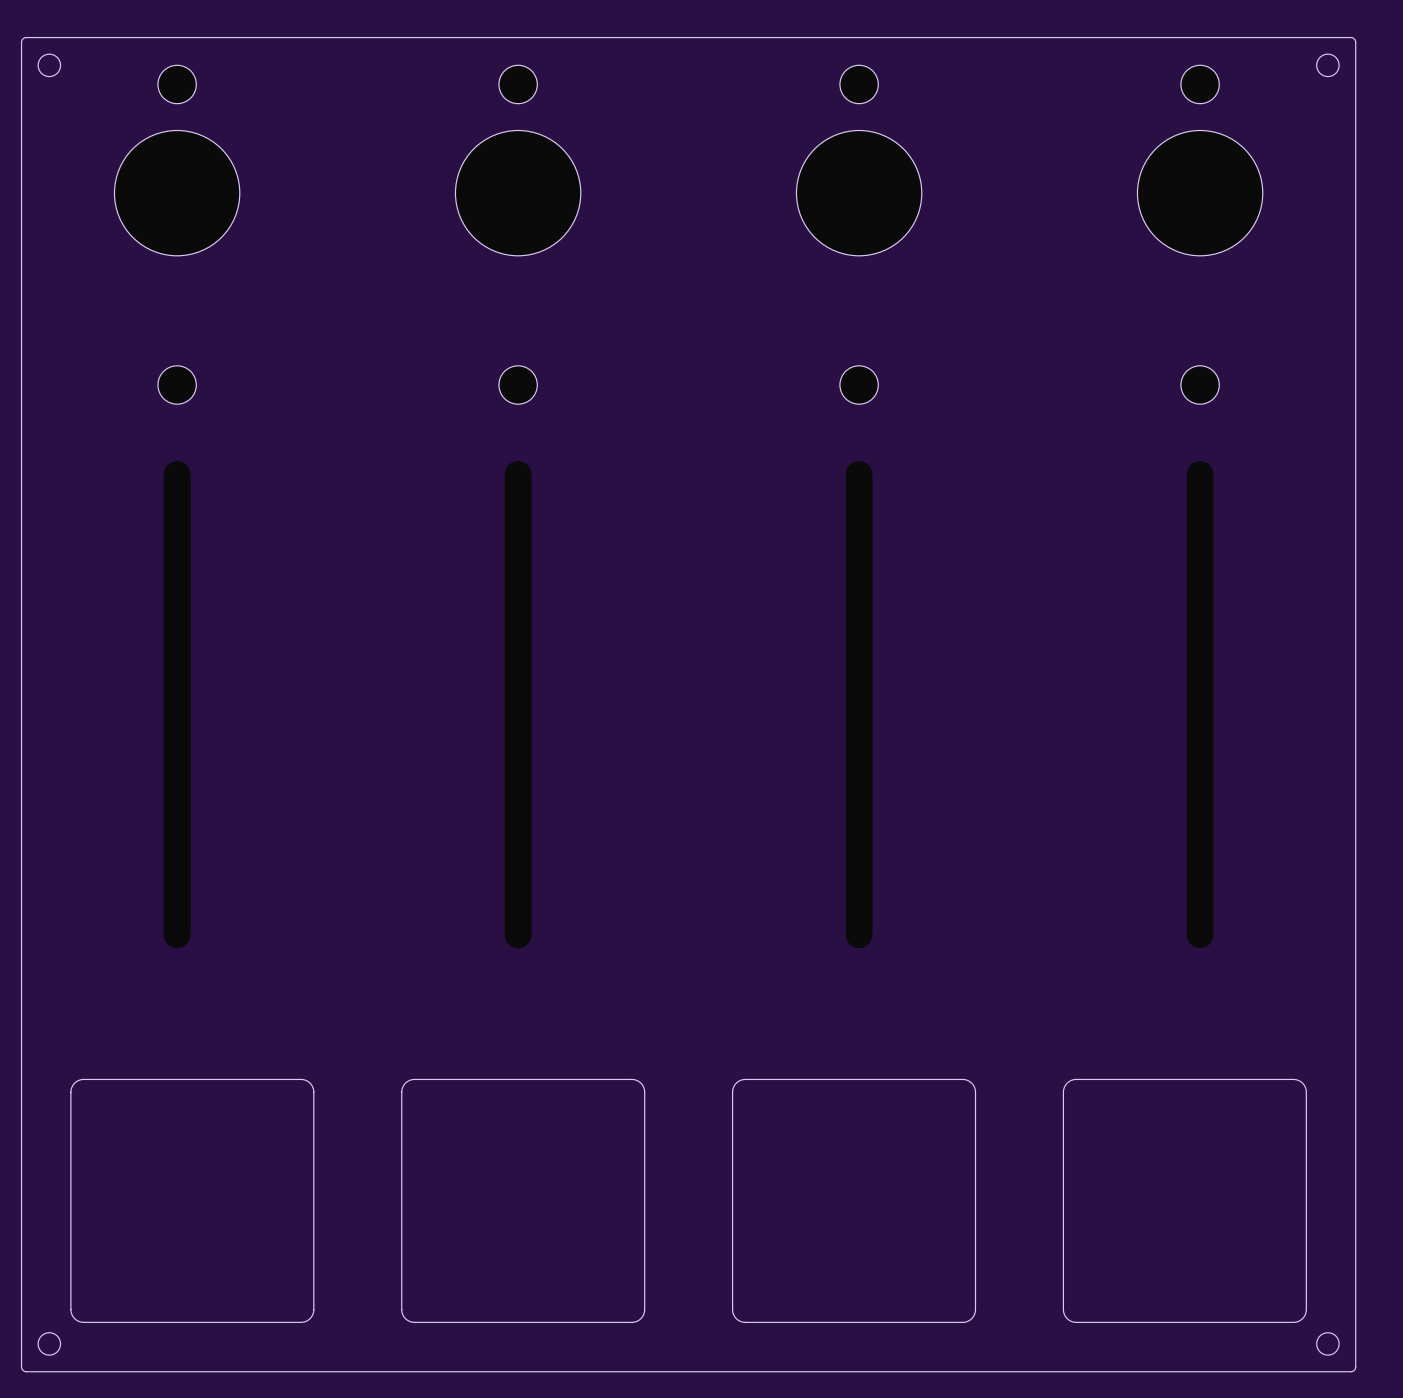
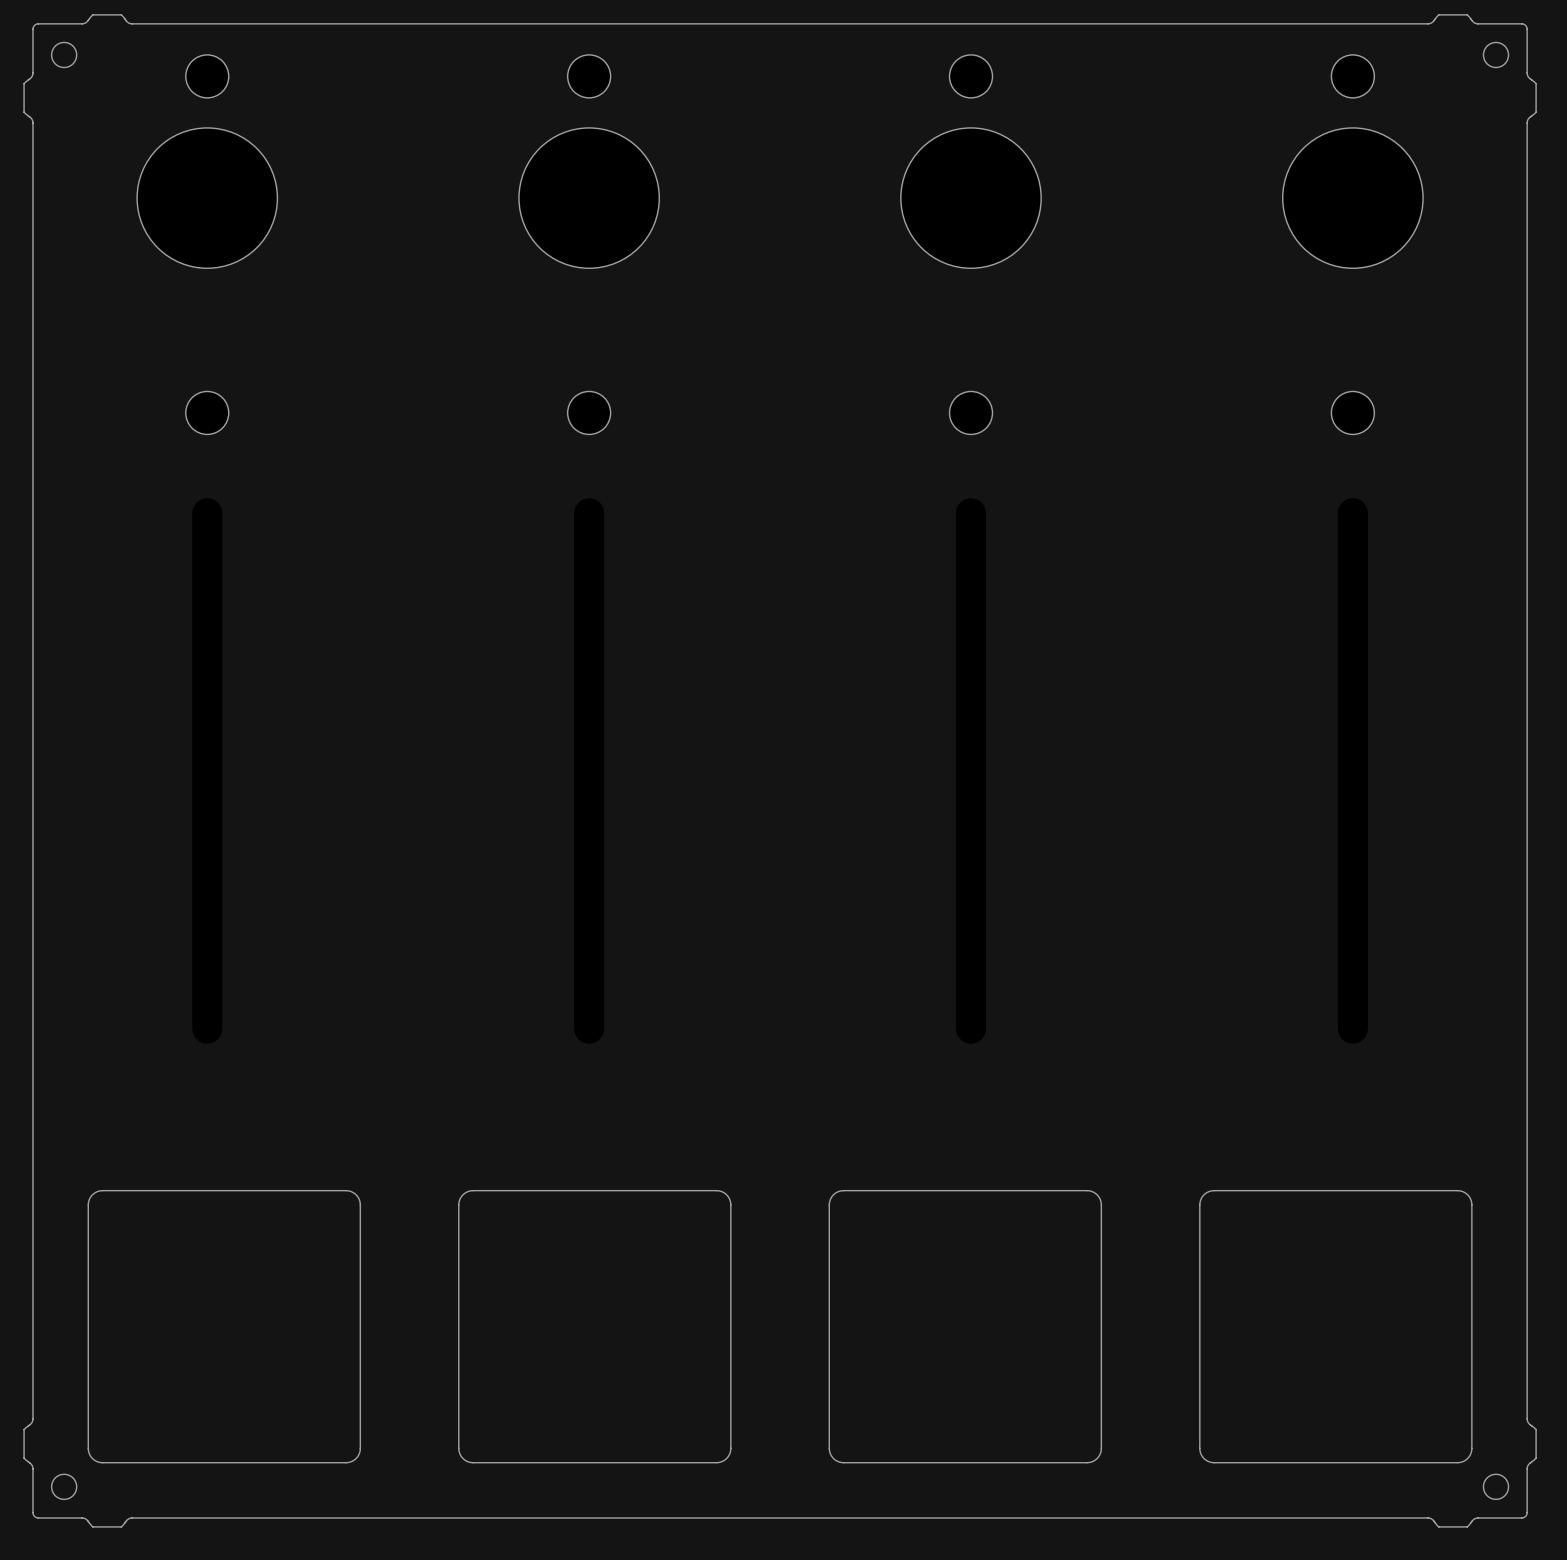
drawing shape: [21, 37, 1357, 1373] -> [23, 14, 1537, 1528]

